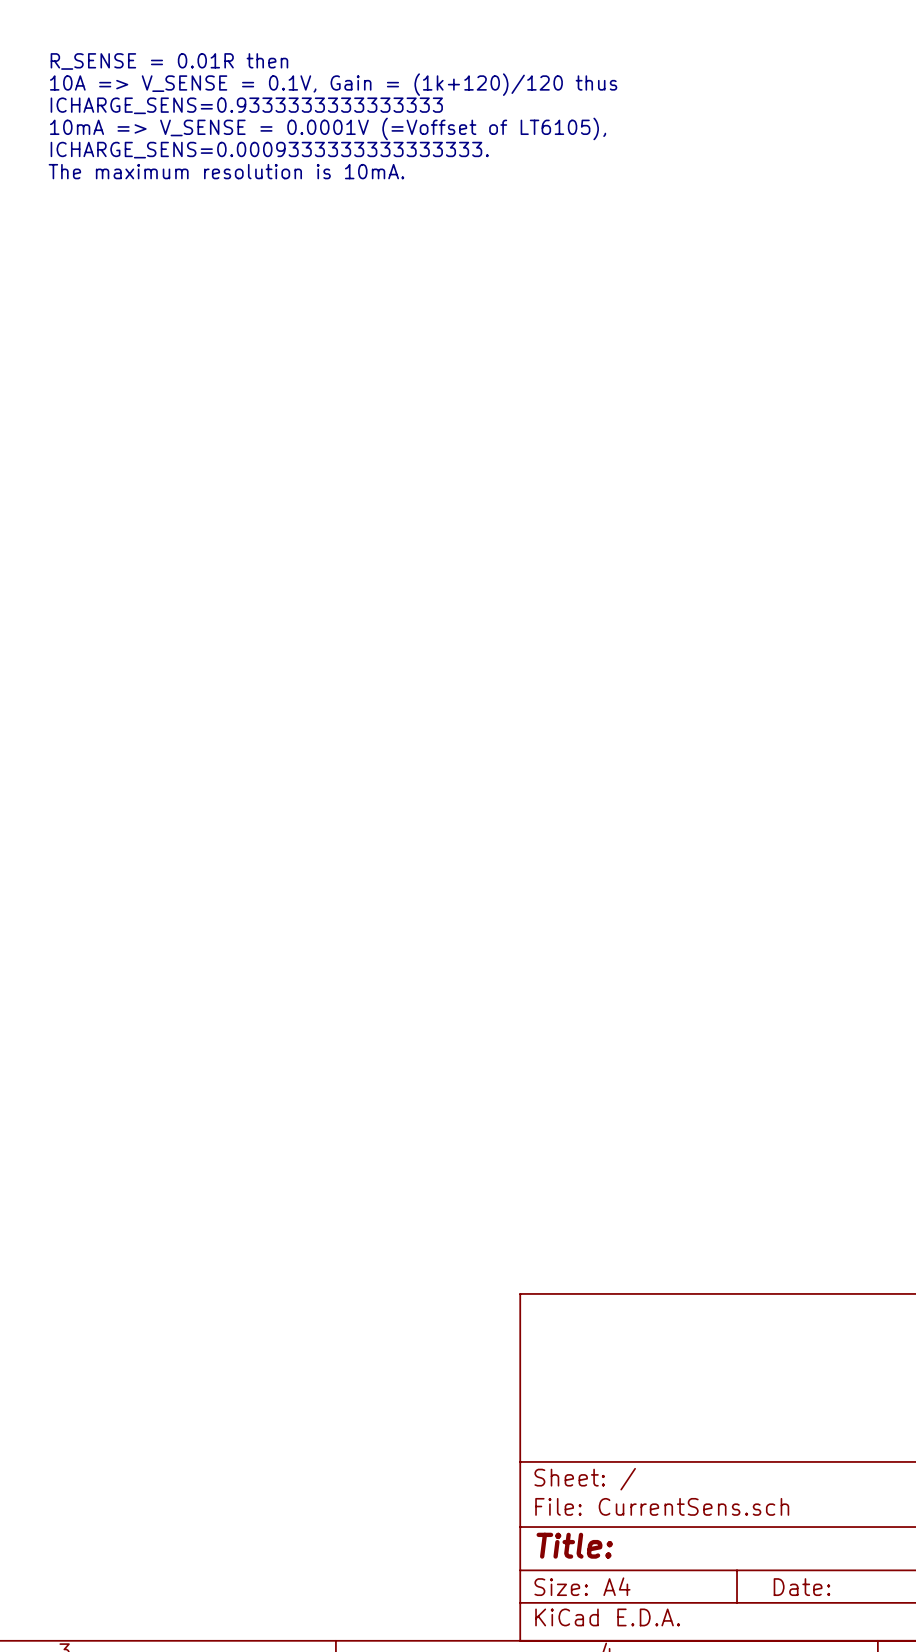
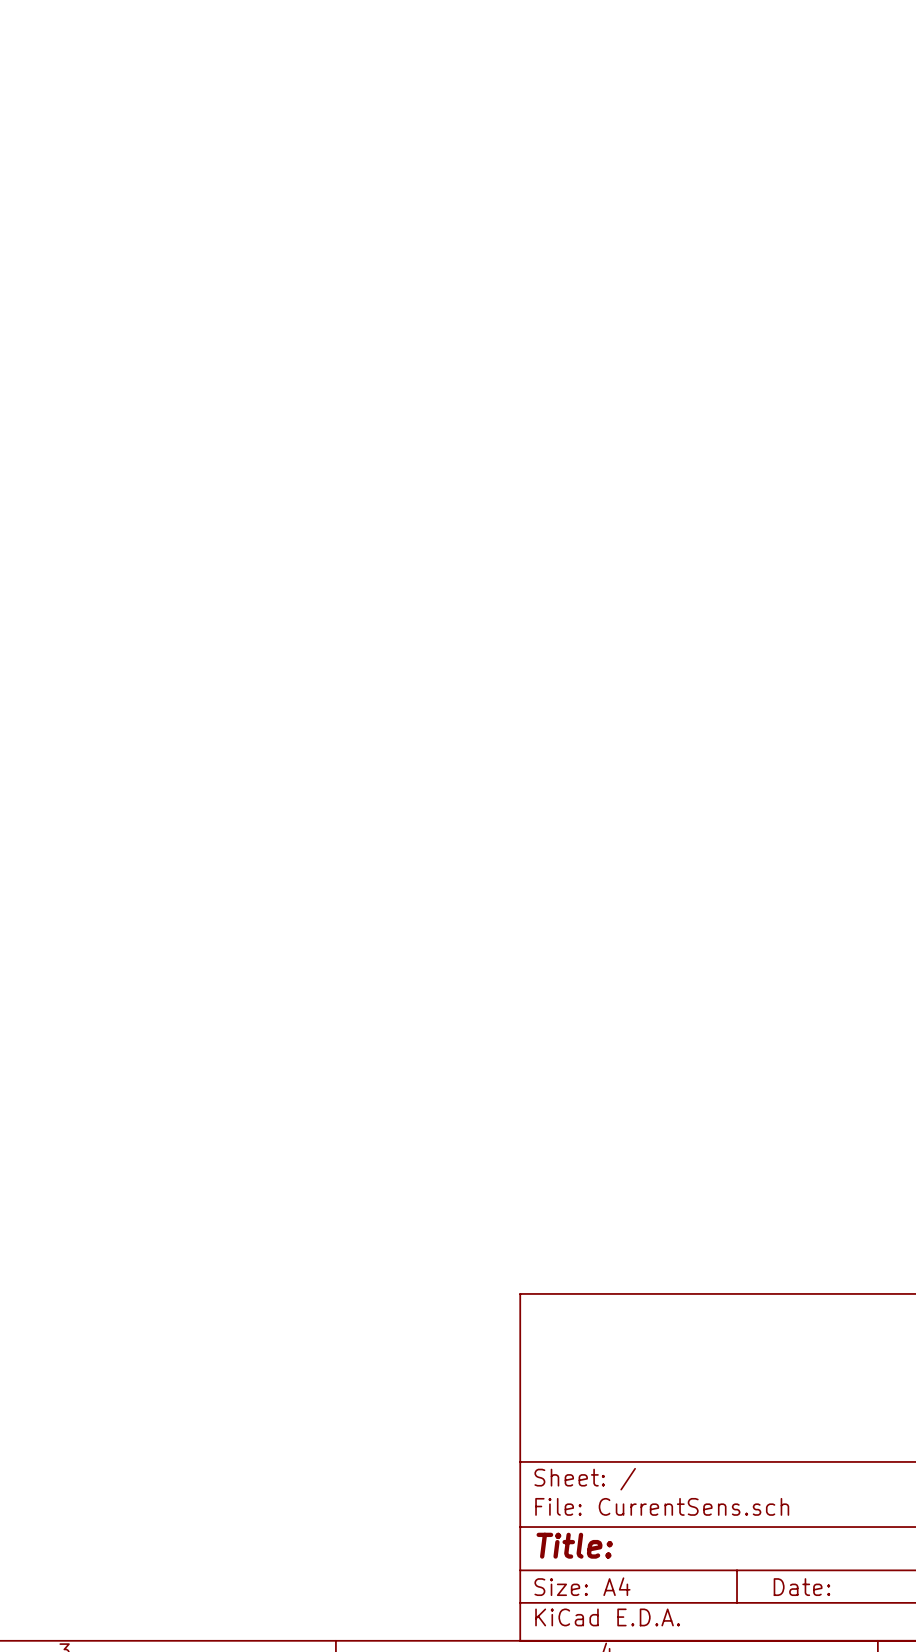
text: R_SENSE = 0.01R then (169, 61) -> none
text: 10A => V_SENSE = 0.1V, Gain = (1k+120)/120 thus (333, 84) -> none
text: ICHARGE_SENS=0.9333333333333333 (246, 105) -> none
text: 10mA => V_SENSE = 0.0001V (=Voffset of LT6105), (328, 128) -> none
text: ICHARGE_SENS=0.0009333333333333333. (269, 150) -> none
text: The maximum resolution is 10mA. (226, 171) -> none

